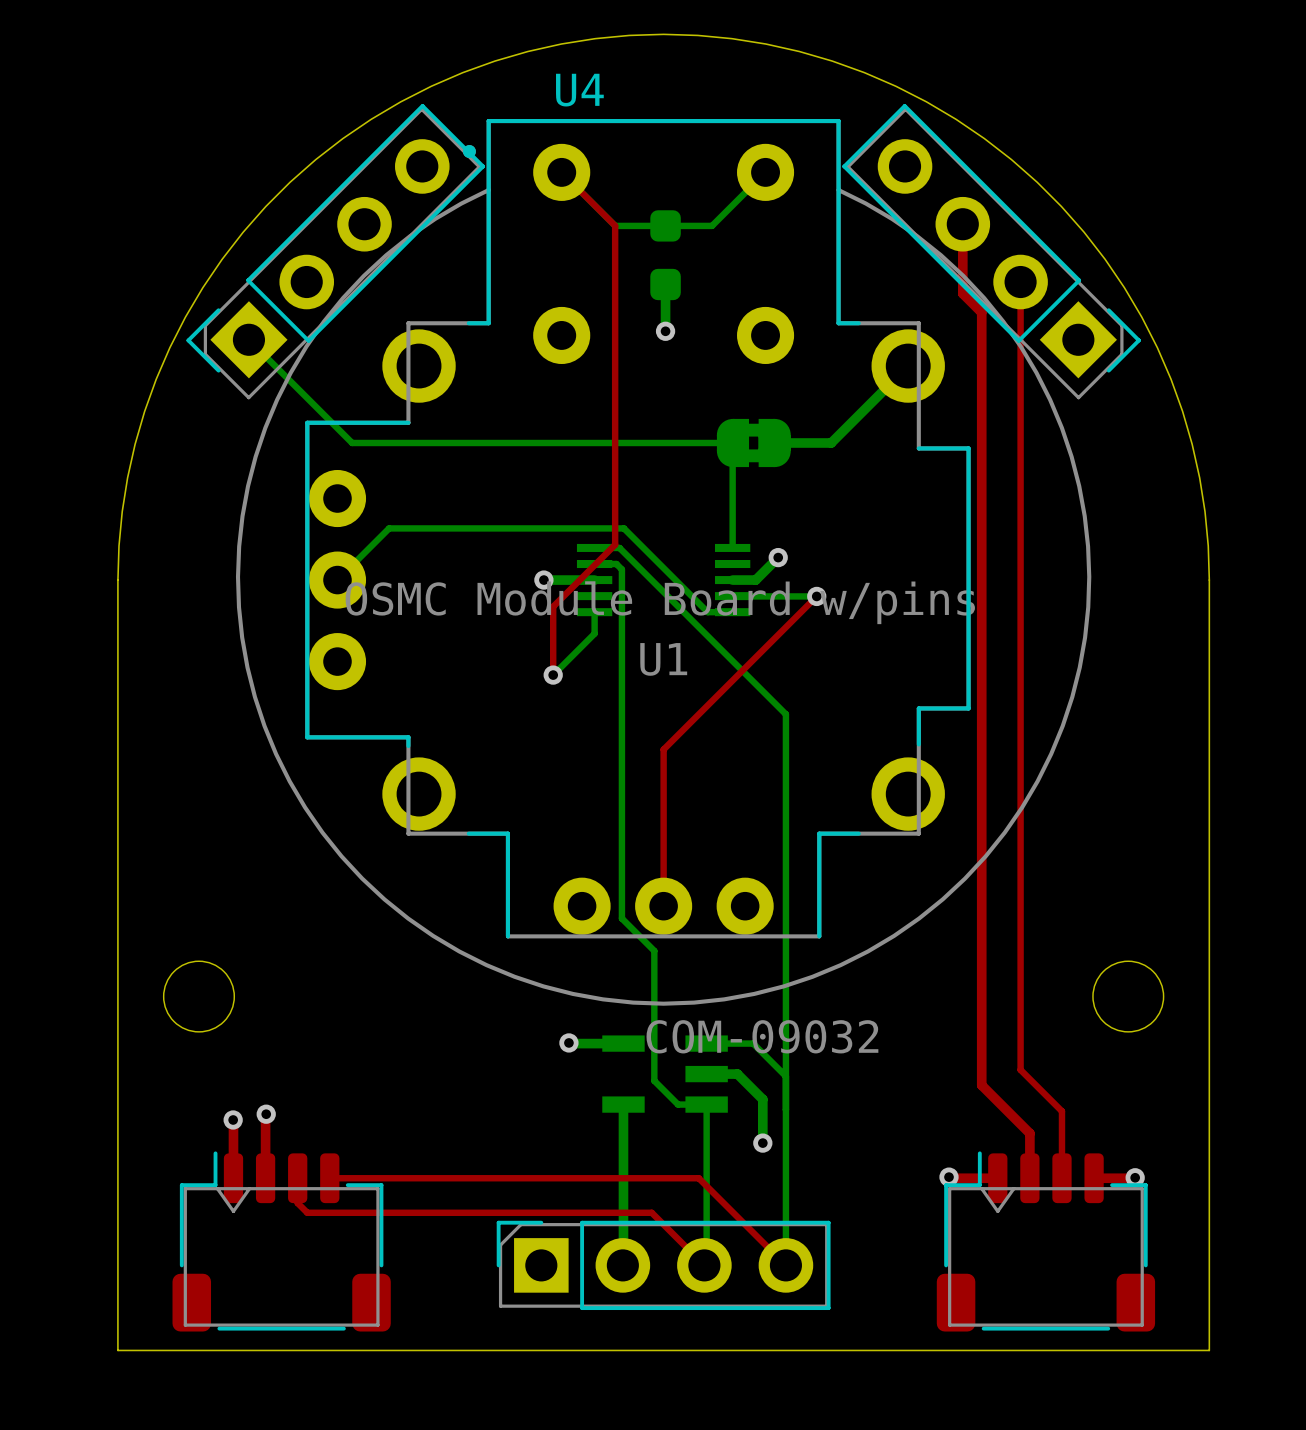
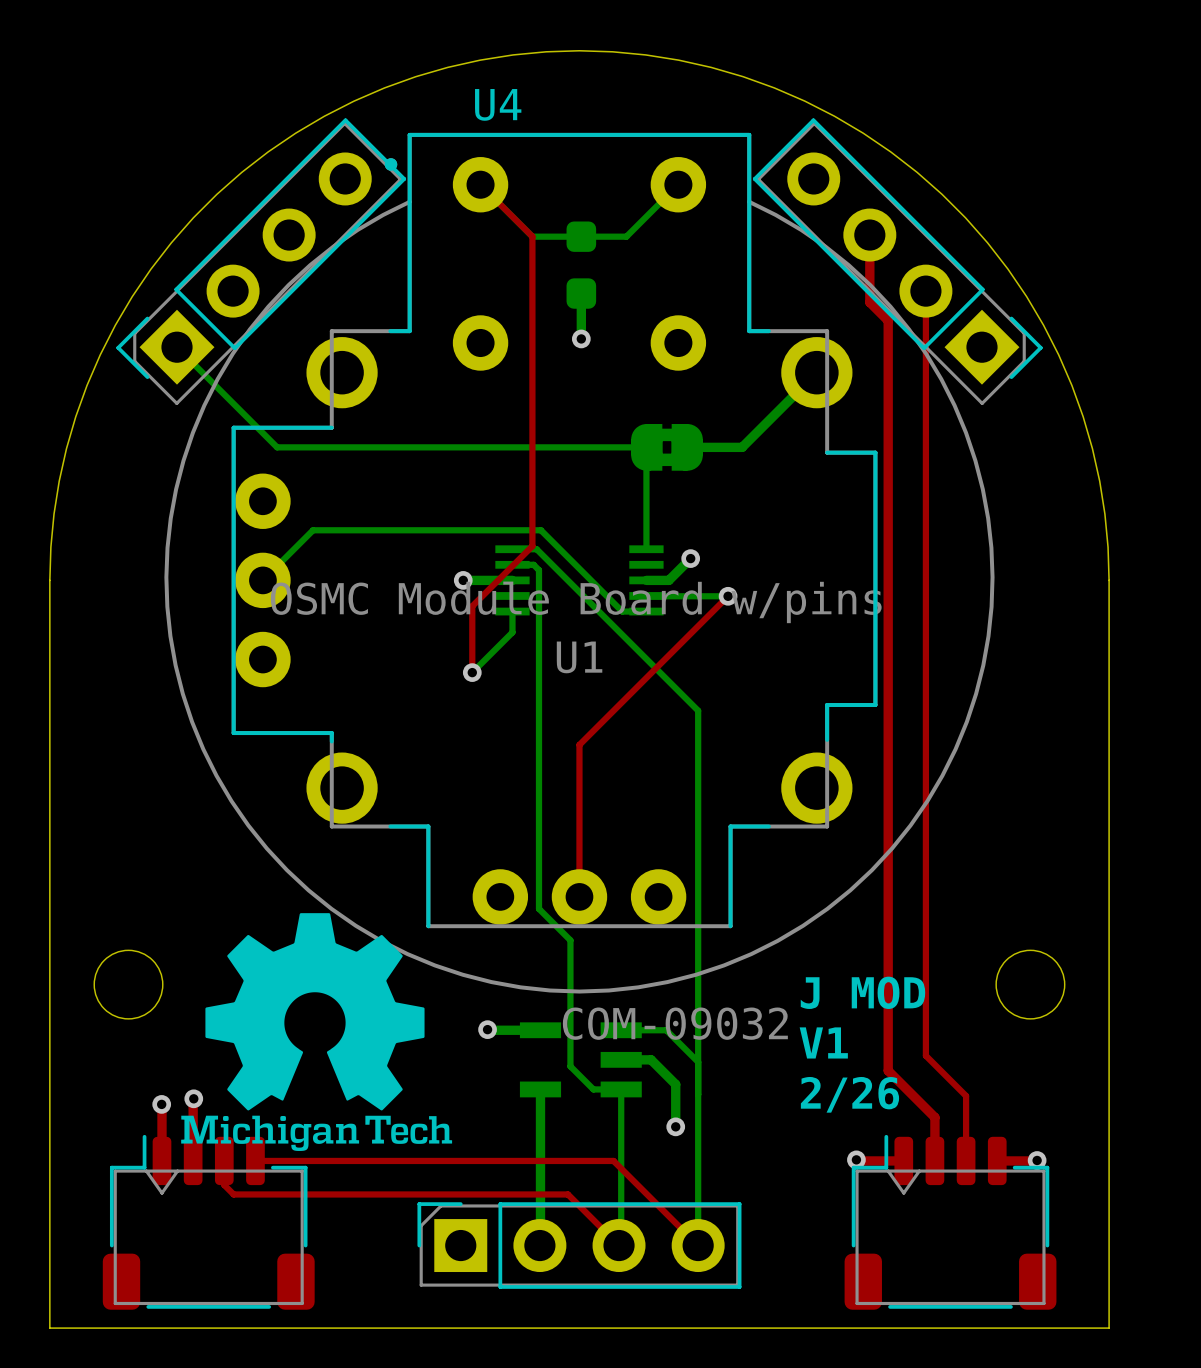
drawing: none -> [181, 913, 453, 1151]
text: none -> J MOD (862, 992)
text: none -> V1 (823, 1042)
text: none -> 2/26 (849, 1094)

